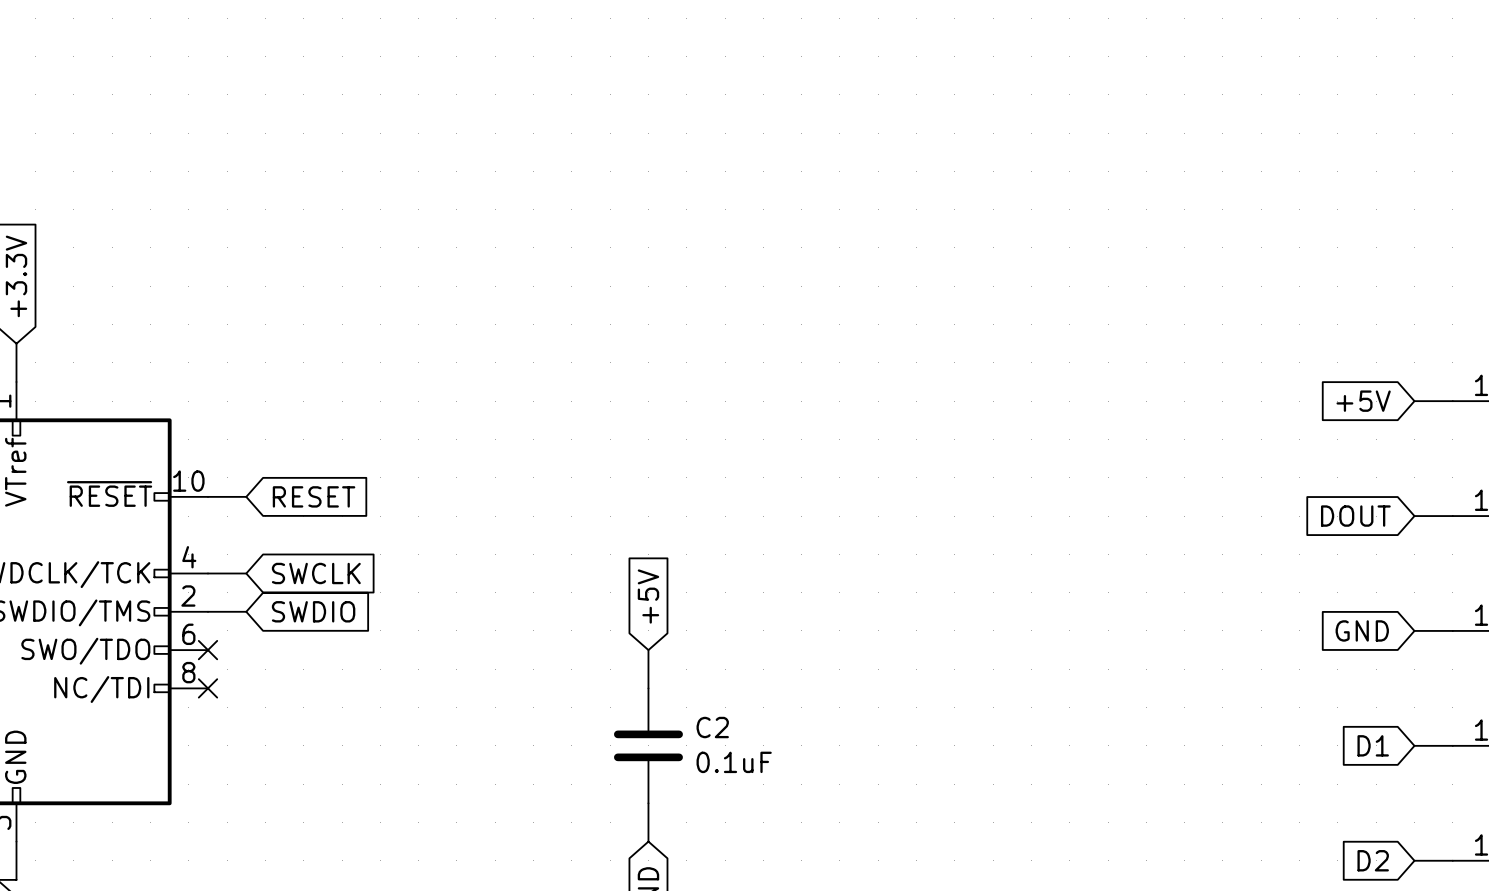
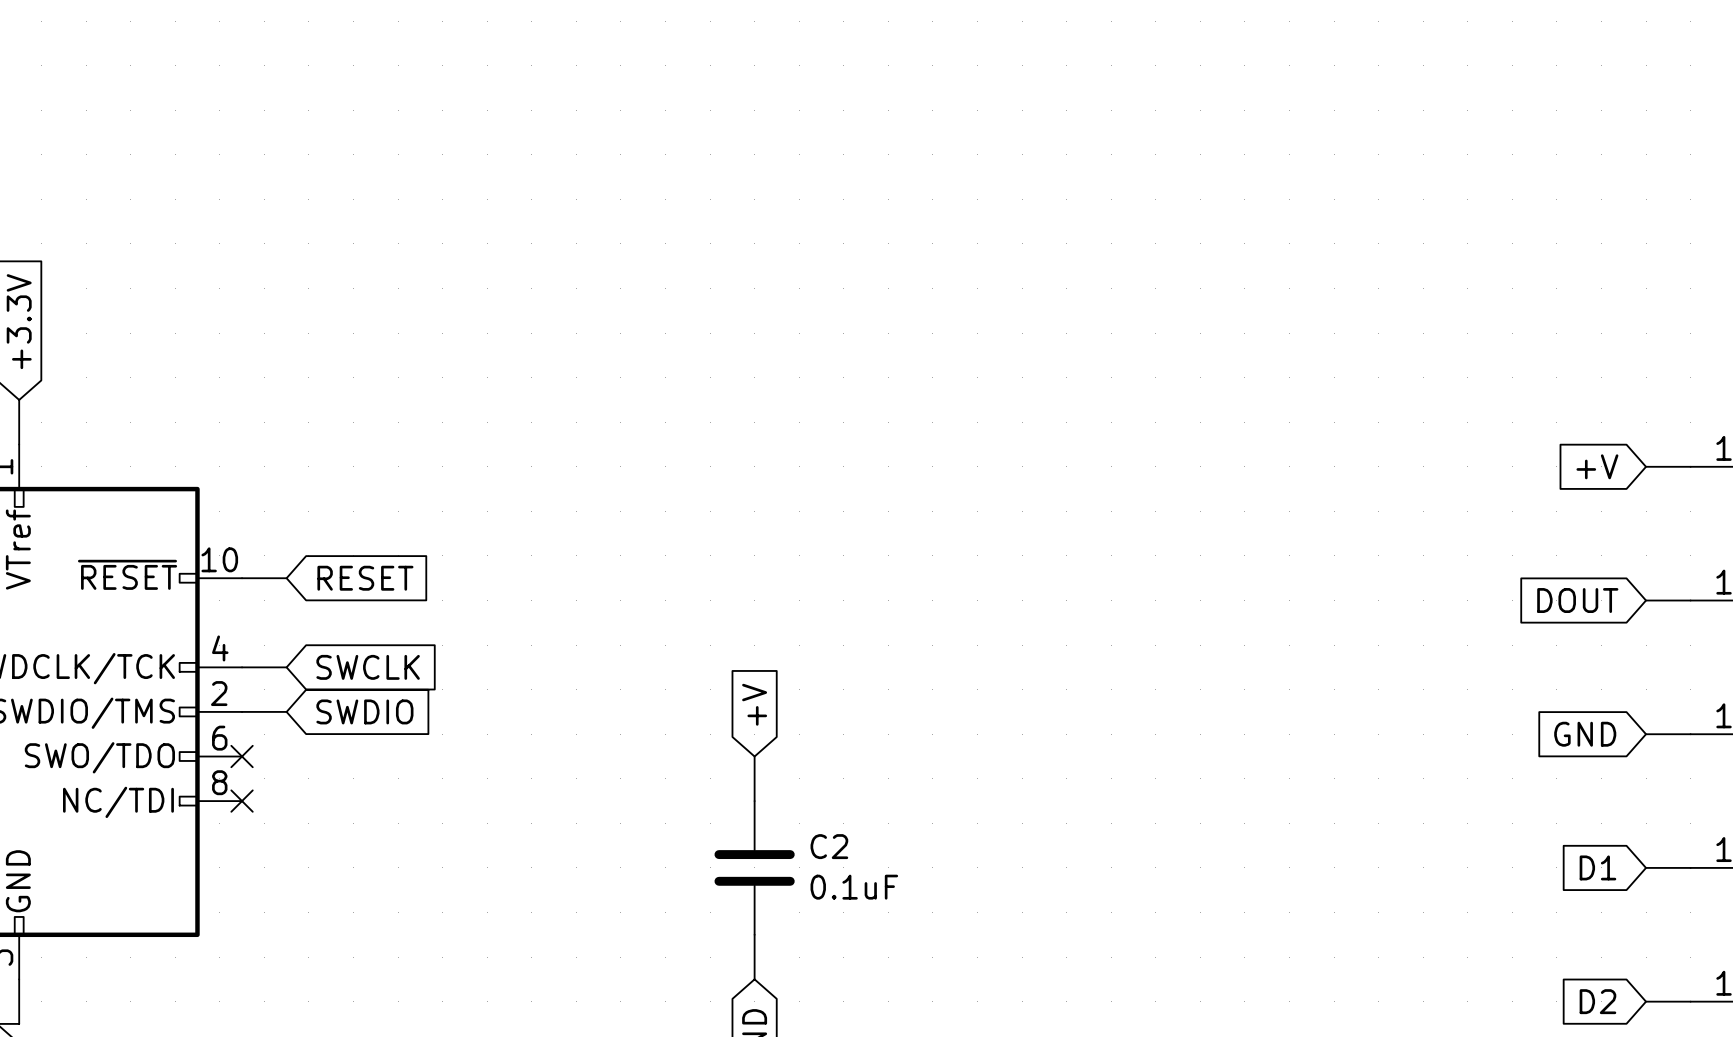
global label: +5V (1363, 401) -> +V (1597, 466)
global label: +5V (648, 596) -> +V (754, 704)

